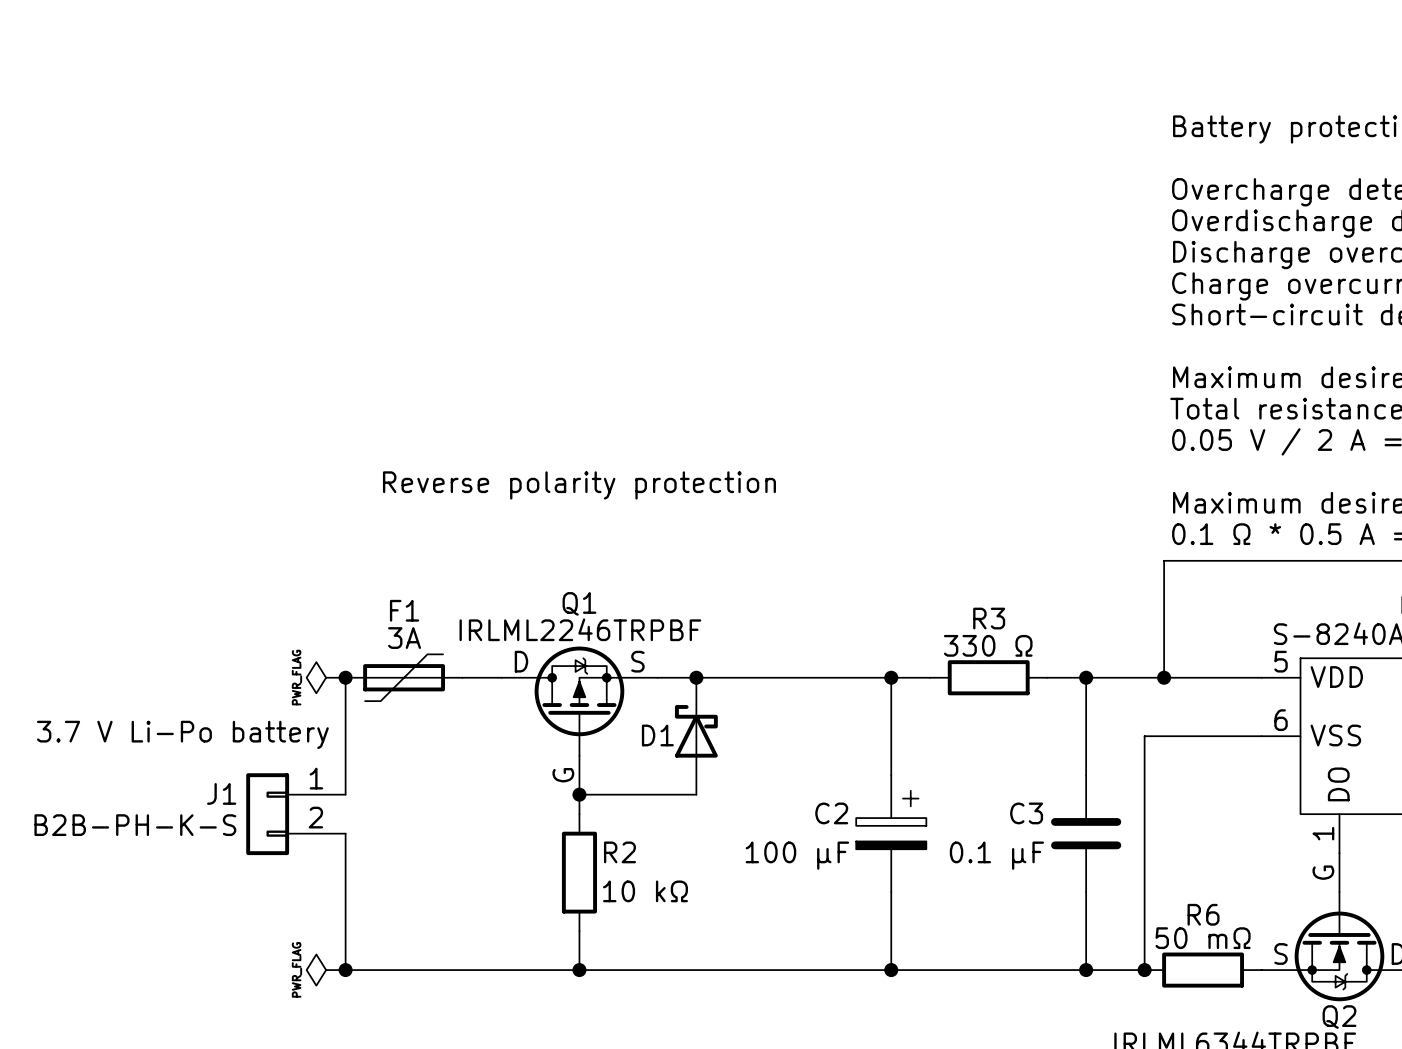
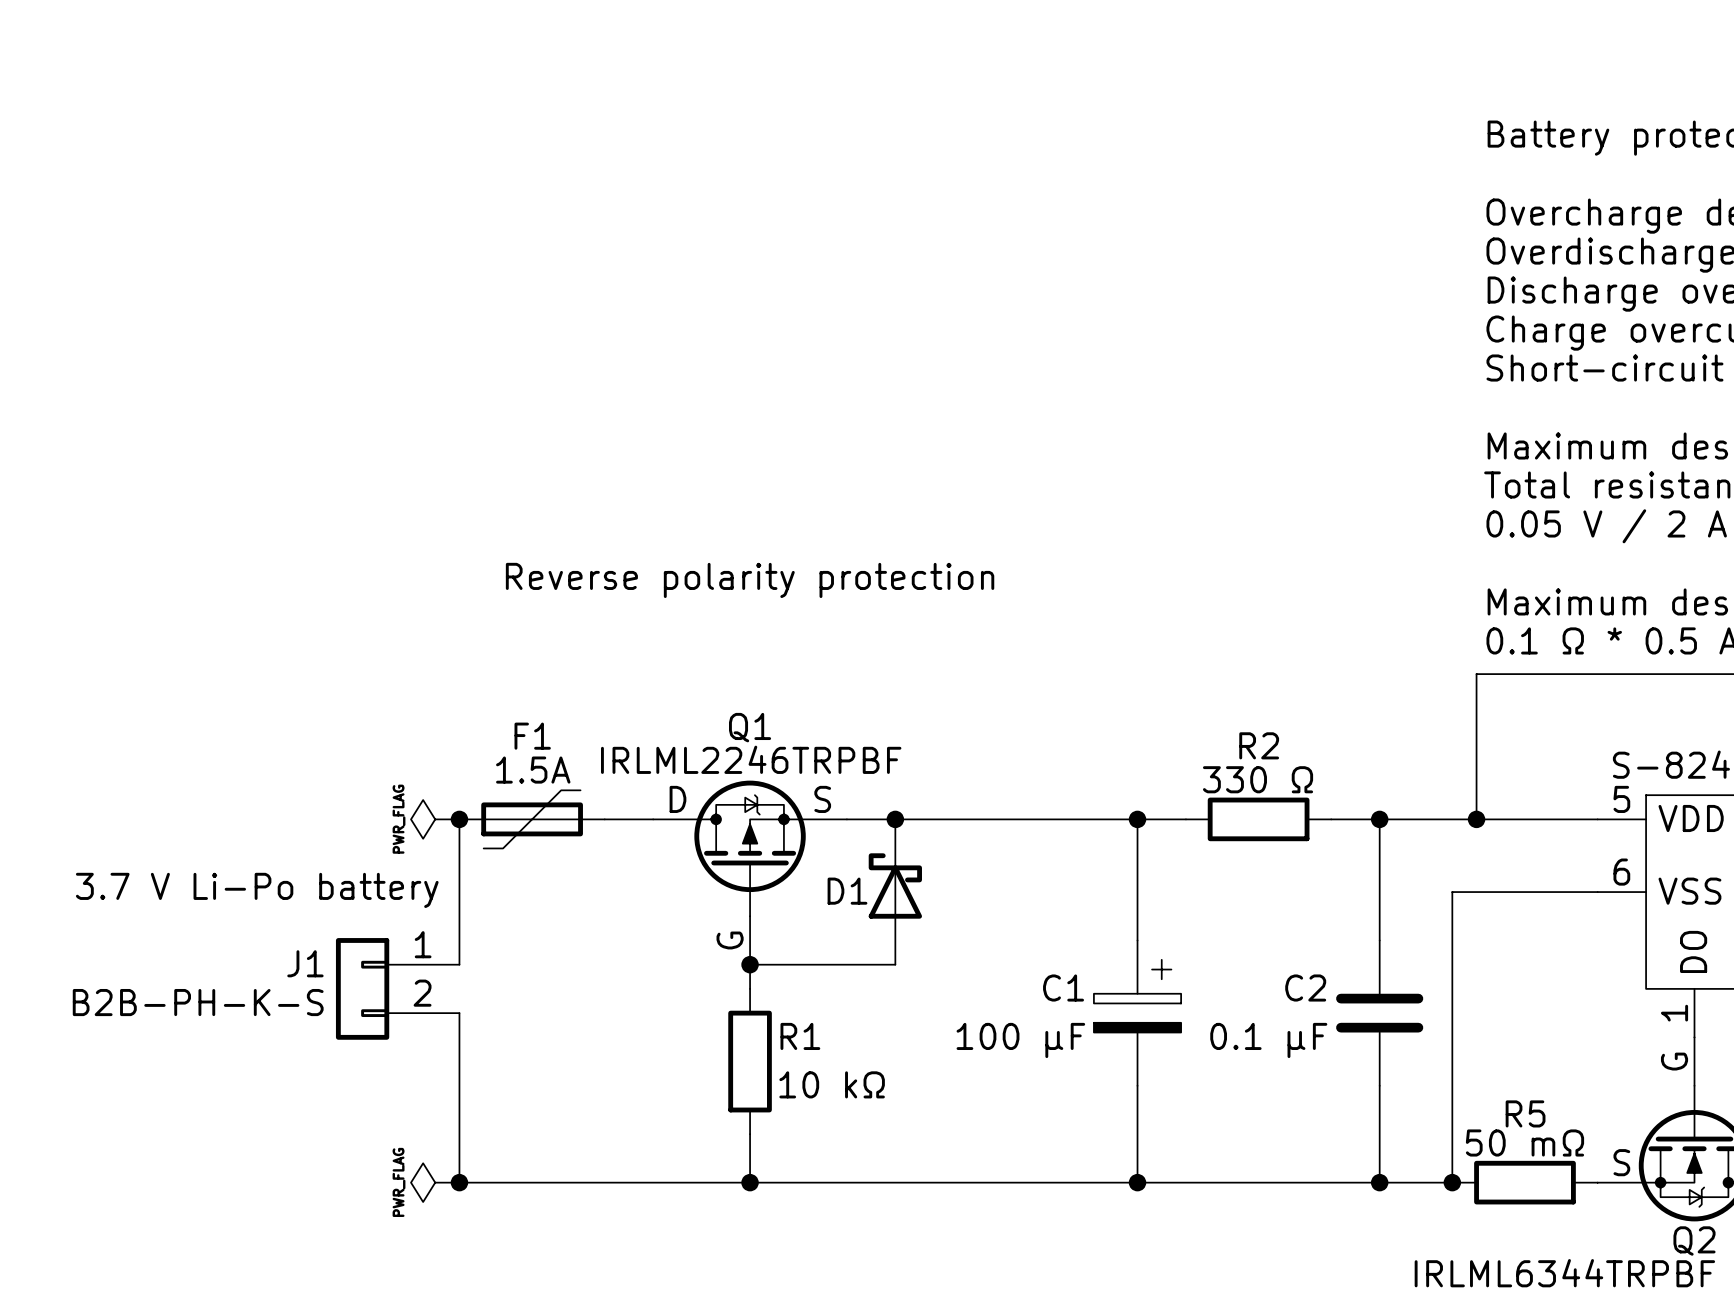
R3 name: R3 (989, 618) -> R2 (1259, 745)
F1 value: 3A (404, 638) -> 1.5A (533, 770)
C2 name: C2 (831, 813) -> C1 (1063, 988)
C3 name: C3 (1026, 813) -> C2 (1305, 988)
R2 name: R2 (619, 852) -> R1 (800, 1036)
R6 name: R6 (1203, 914) -> R5 (1525, 1113)

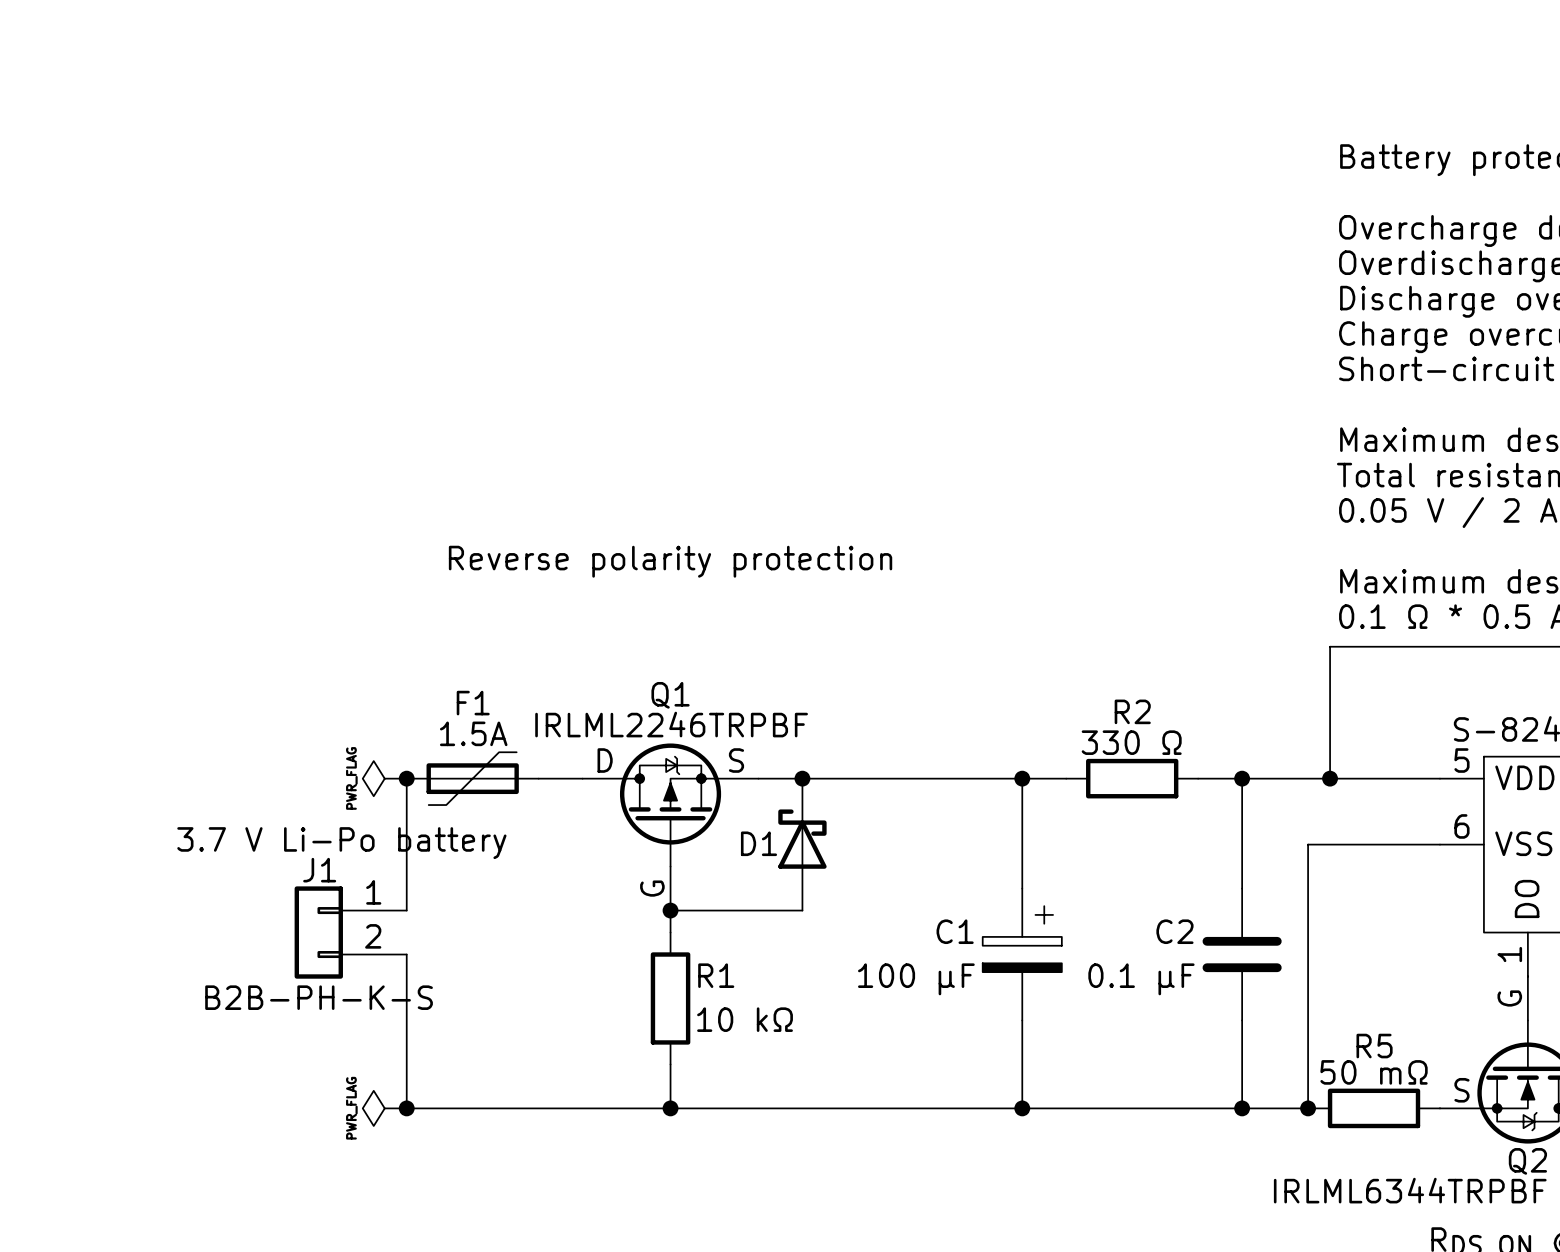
text position: 3.7 V Li-Po battery (257, 890) -> 3.7 V Li-Po battery (341, 843)
J1 name position: J1 (305, 963) -> J1 (319, 870)
J1 value position: B2B-PH-K-S (198, 1002) -> B2B-PH-K-S (319, 997)

